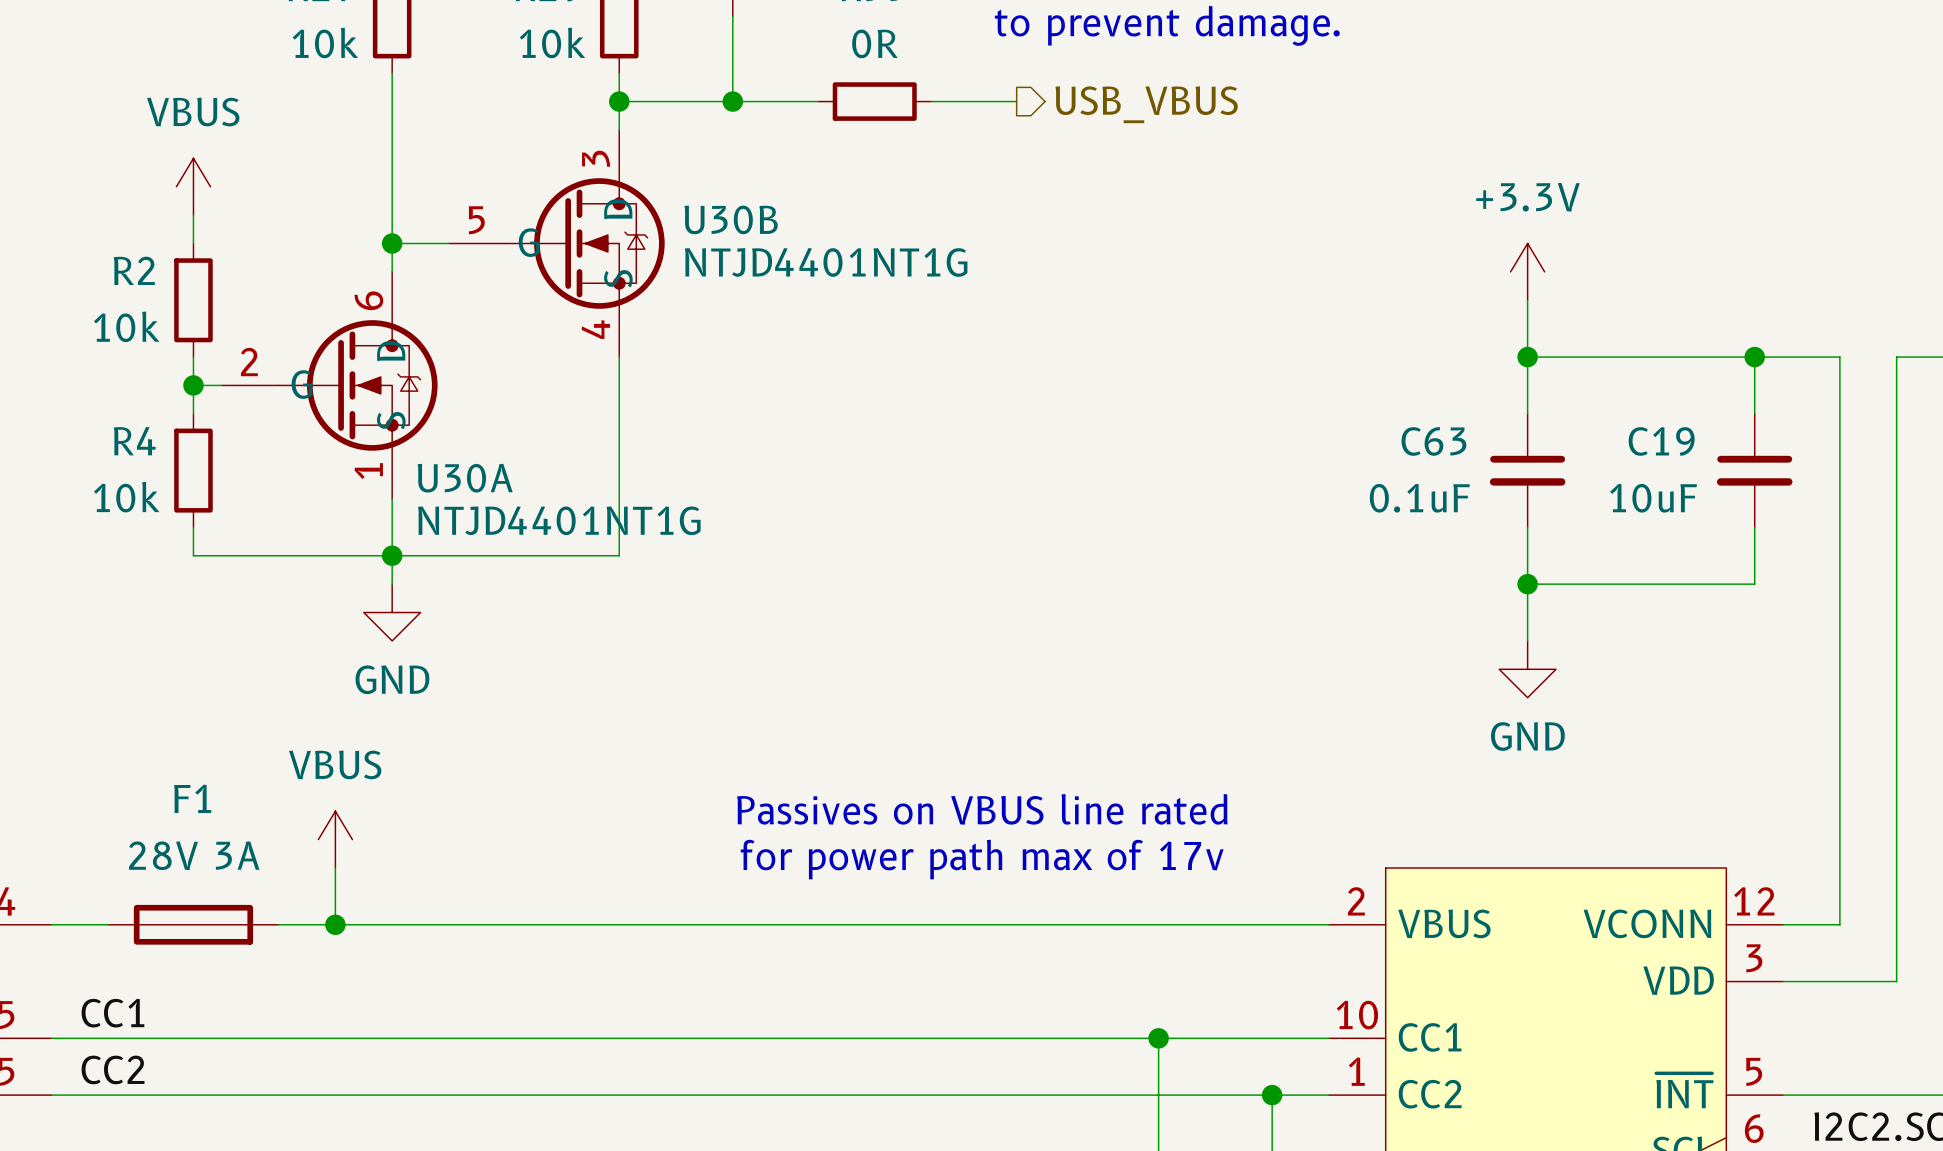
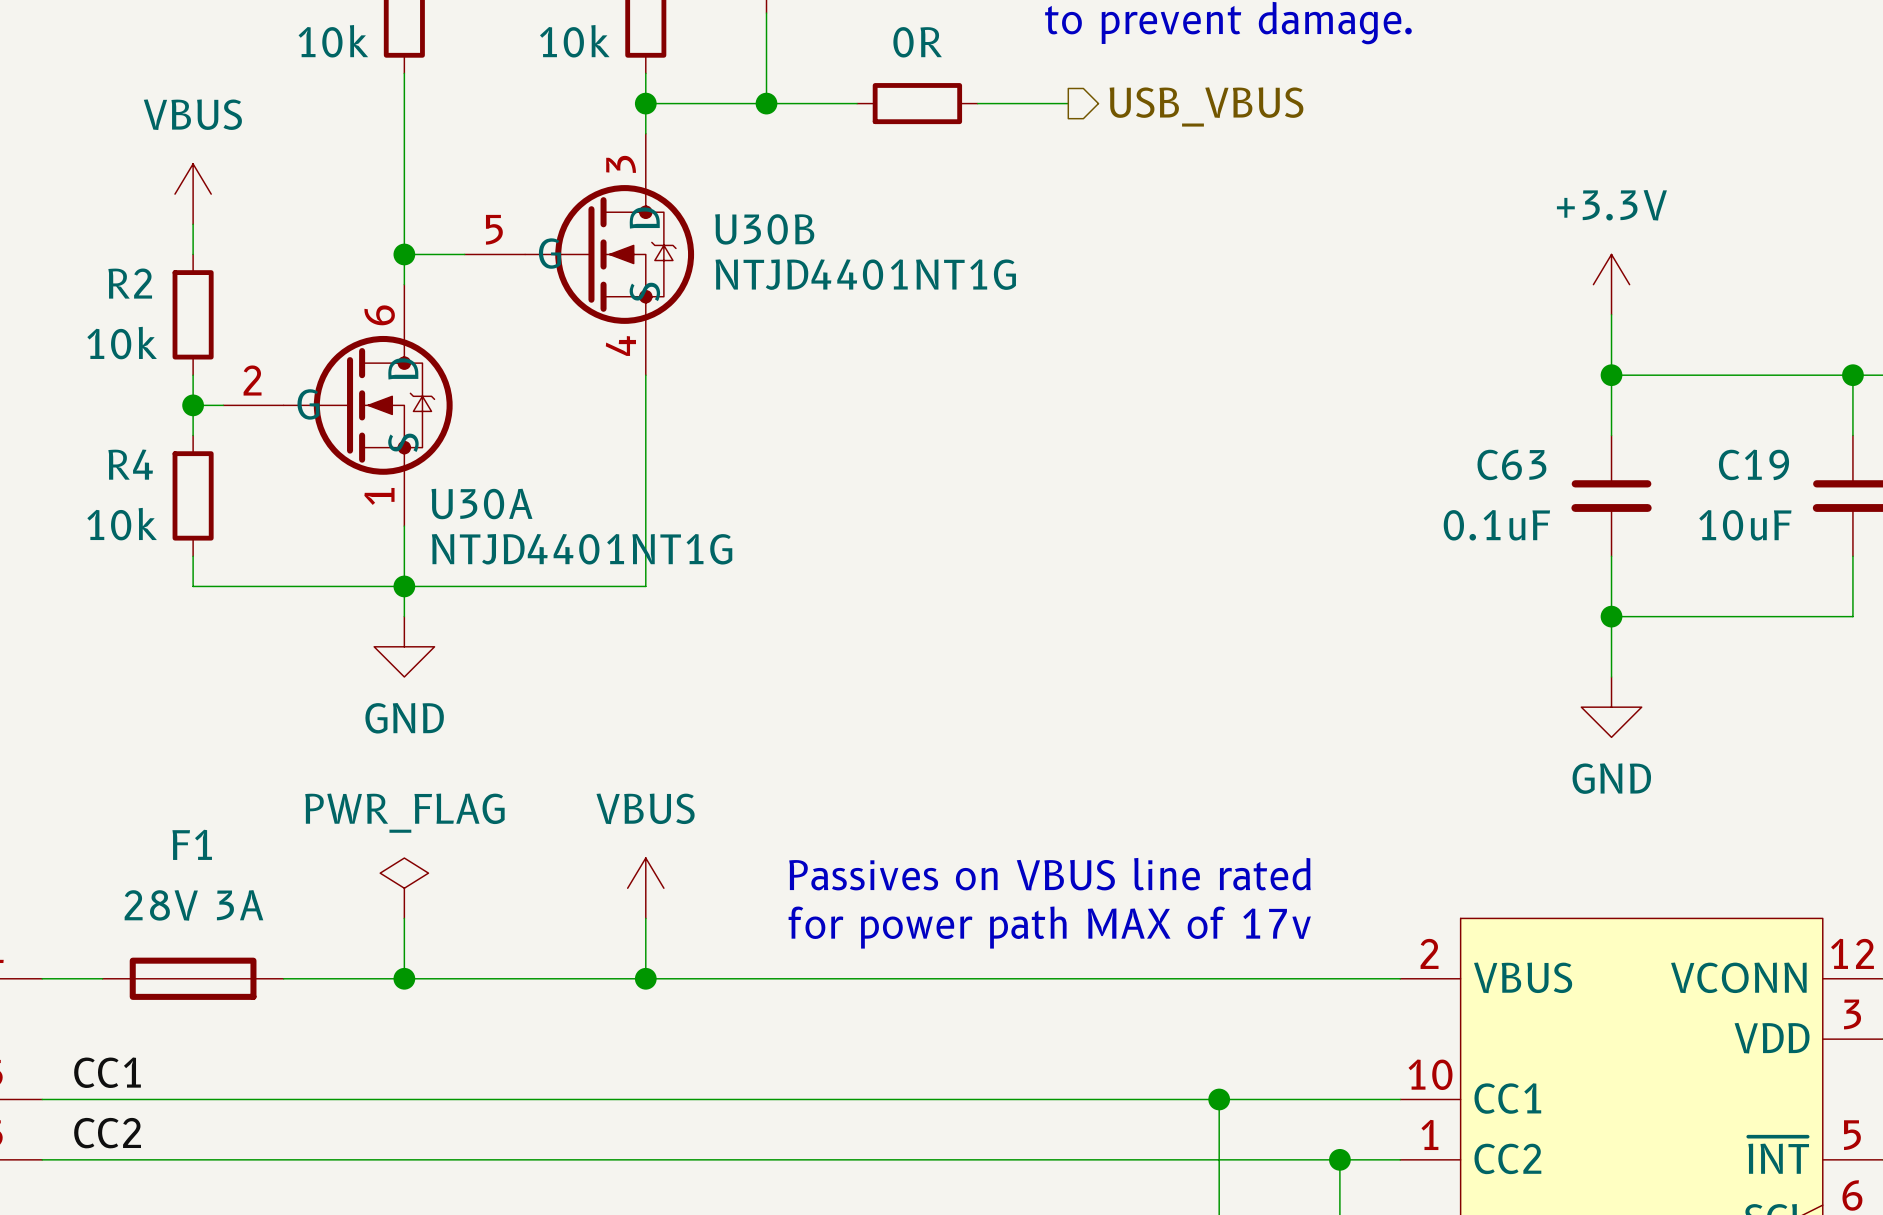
text position: Passives on VBUS line rated (982, 809) -> Passives on VBUS line rated (1049, 874)
power symbol position: VBUS (335, 839) -> VBUS (645, 888)
power symbol: none -> PWR_FLAG (404, 888)
text: for power path max of 17v (982, 859) -> for power path MAX of 17v (1049, 927)
wire: (335, 868) (335, 924) -> (404, 918) (404, 978)
wire: none -> (645, 918) (645, 978)
junction position: (335, 924) -> (404, 978)
junction: none -> (645, 978)

